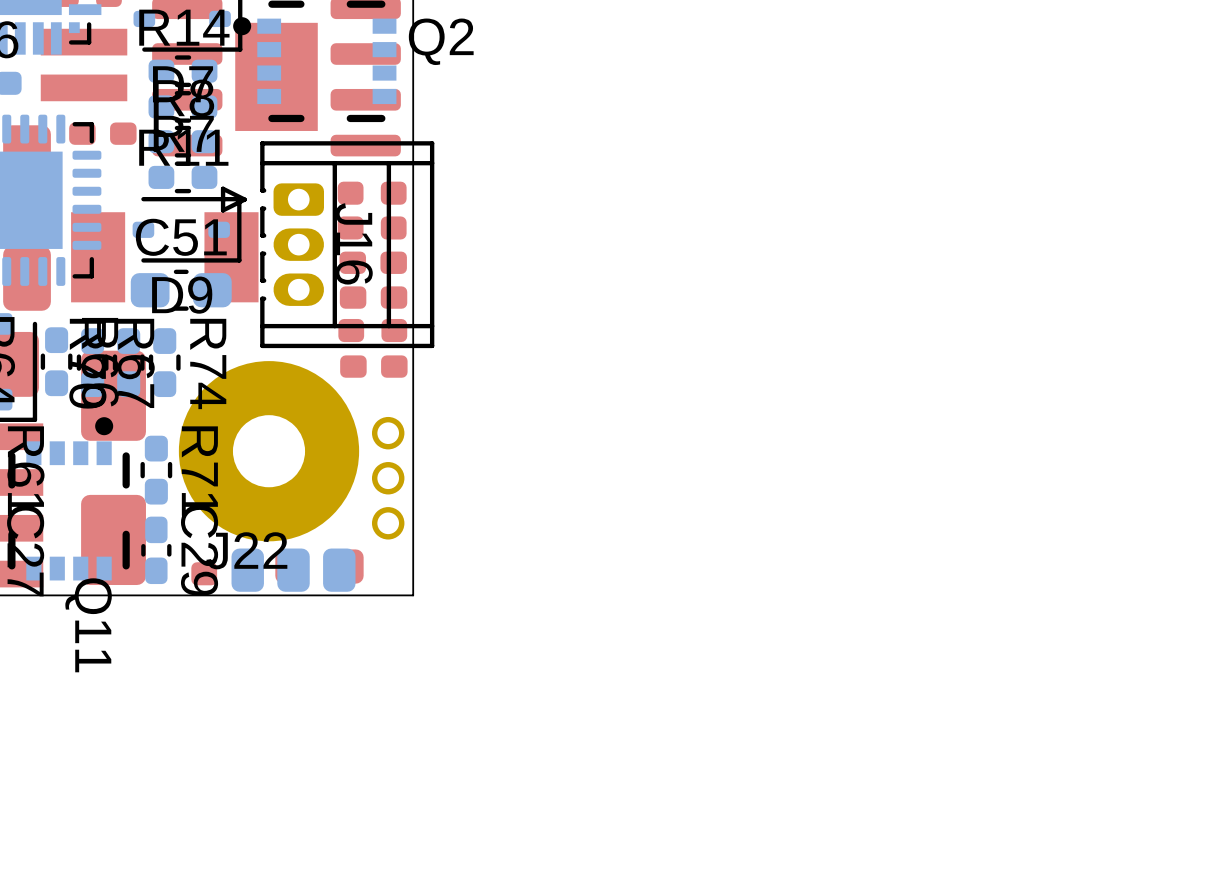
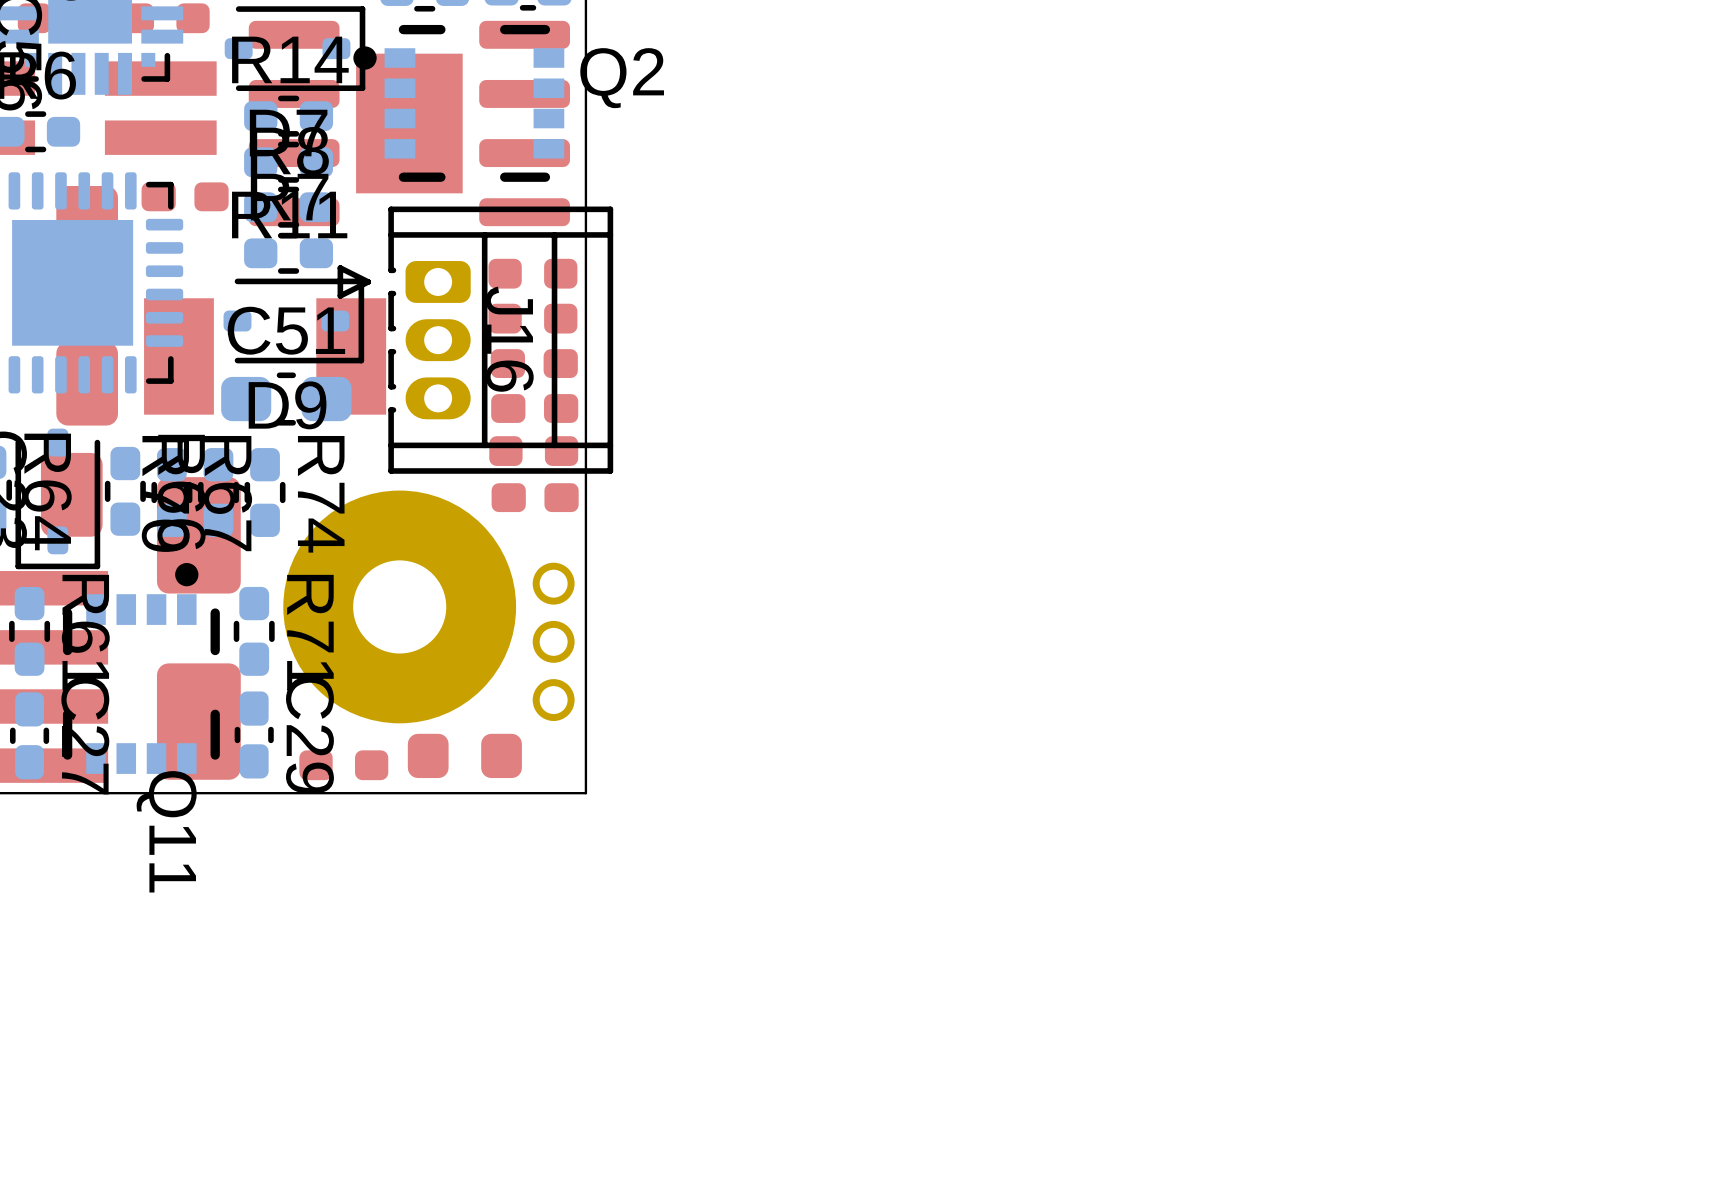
J22: (293, 570) -> none

